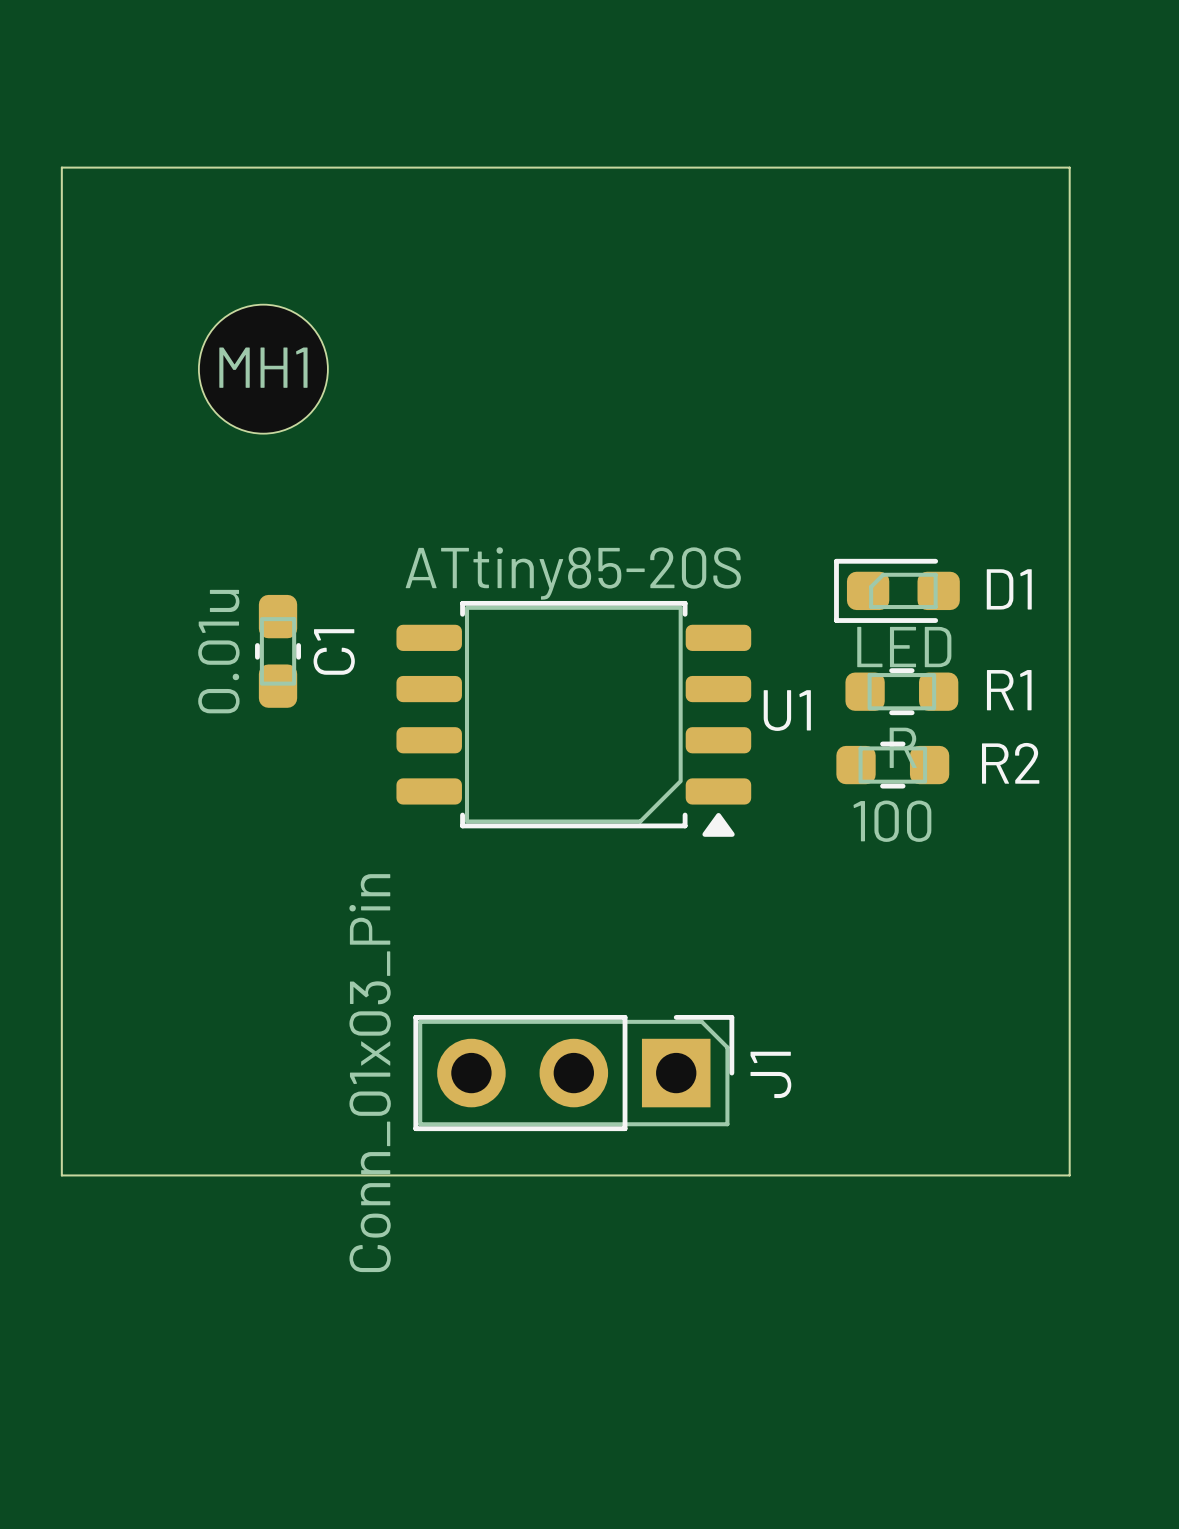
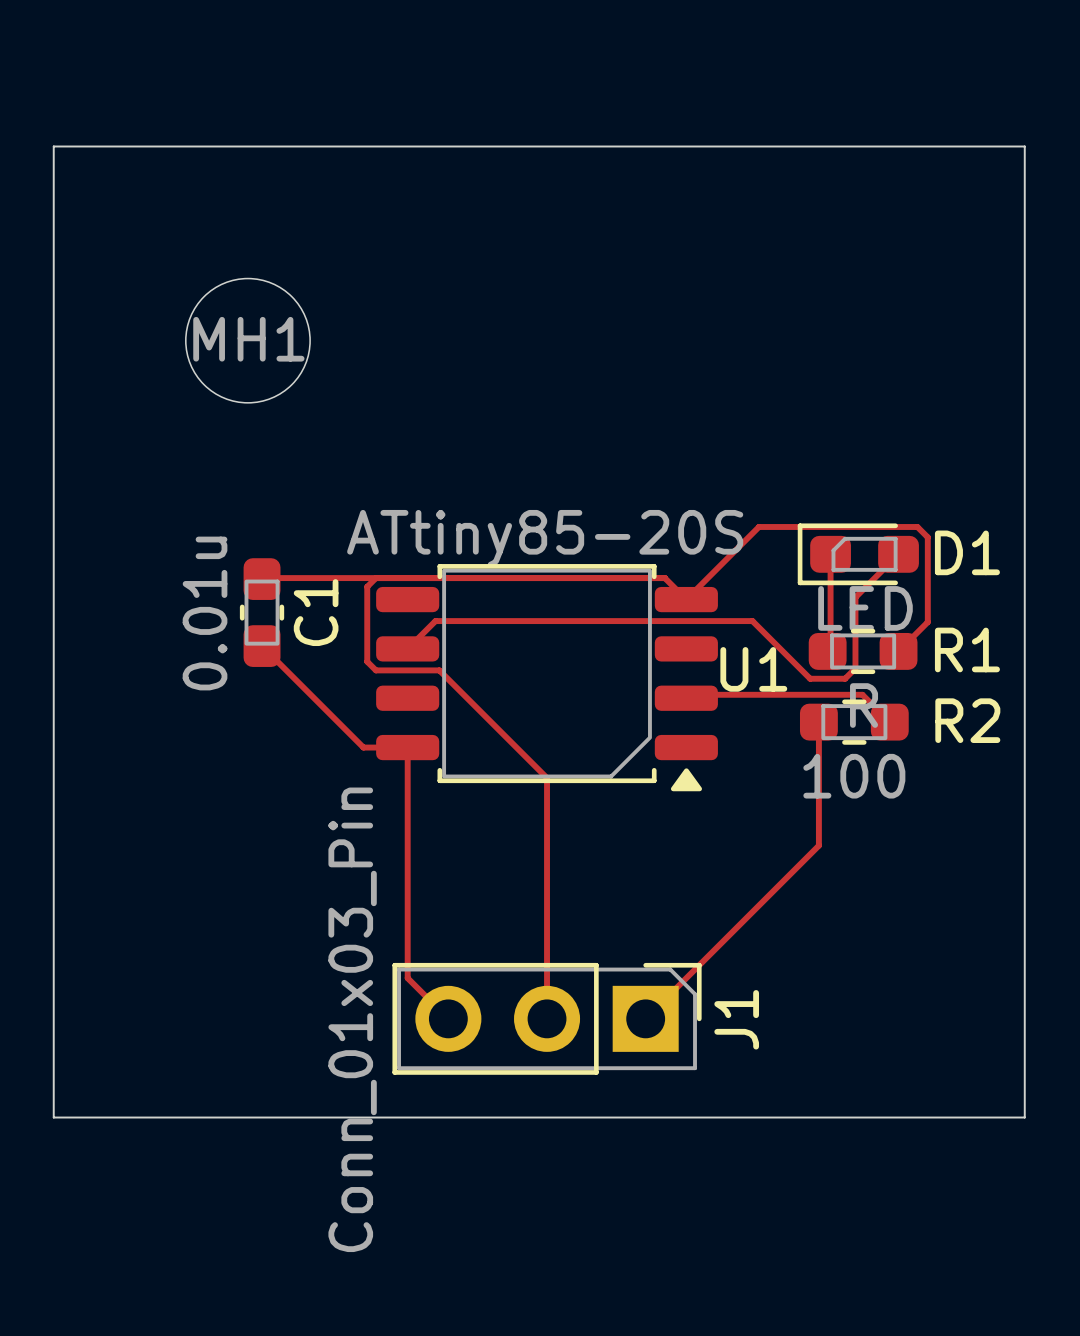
track: none -> (830, 554) (830, 648) (827, 651)
track: none -> (898, 554) (855, 597) (855, 668) (845, 678) (810, 678) (752, 621) (435, 621) (407, 648)
track: none -> (375, 578) (367, 586) (367, 661) (375, 670) (439, 670) (547, 778) (547, 1018)
track: none -> (262, 579) (664, 578) (686, 599) (758, 526) (917, 526) (927, 537) (927, 622) (898, 651)
track: none -> (262, 646) (363, 747) (407, 747) (407, 978) (448, 1018)
track: none -> (686, 698) (689, 694) (862, 694) (889, 722)
track: none -> (818, 722) (818, 845) (645, 1018)

